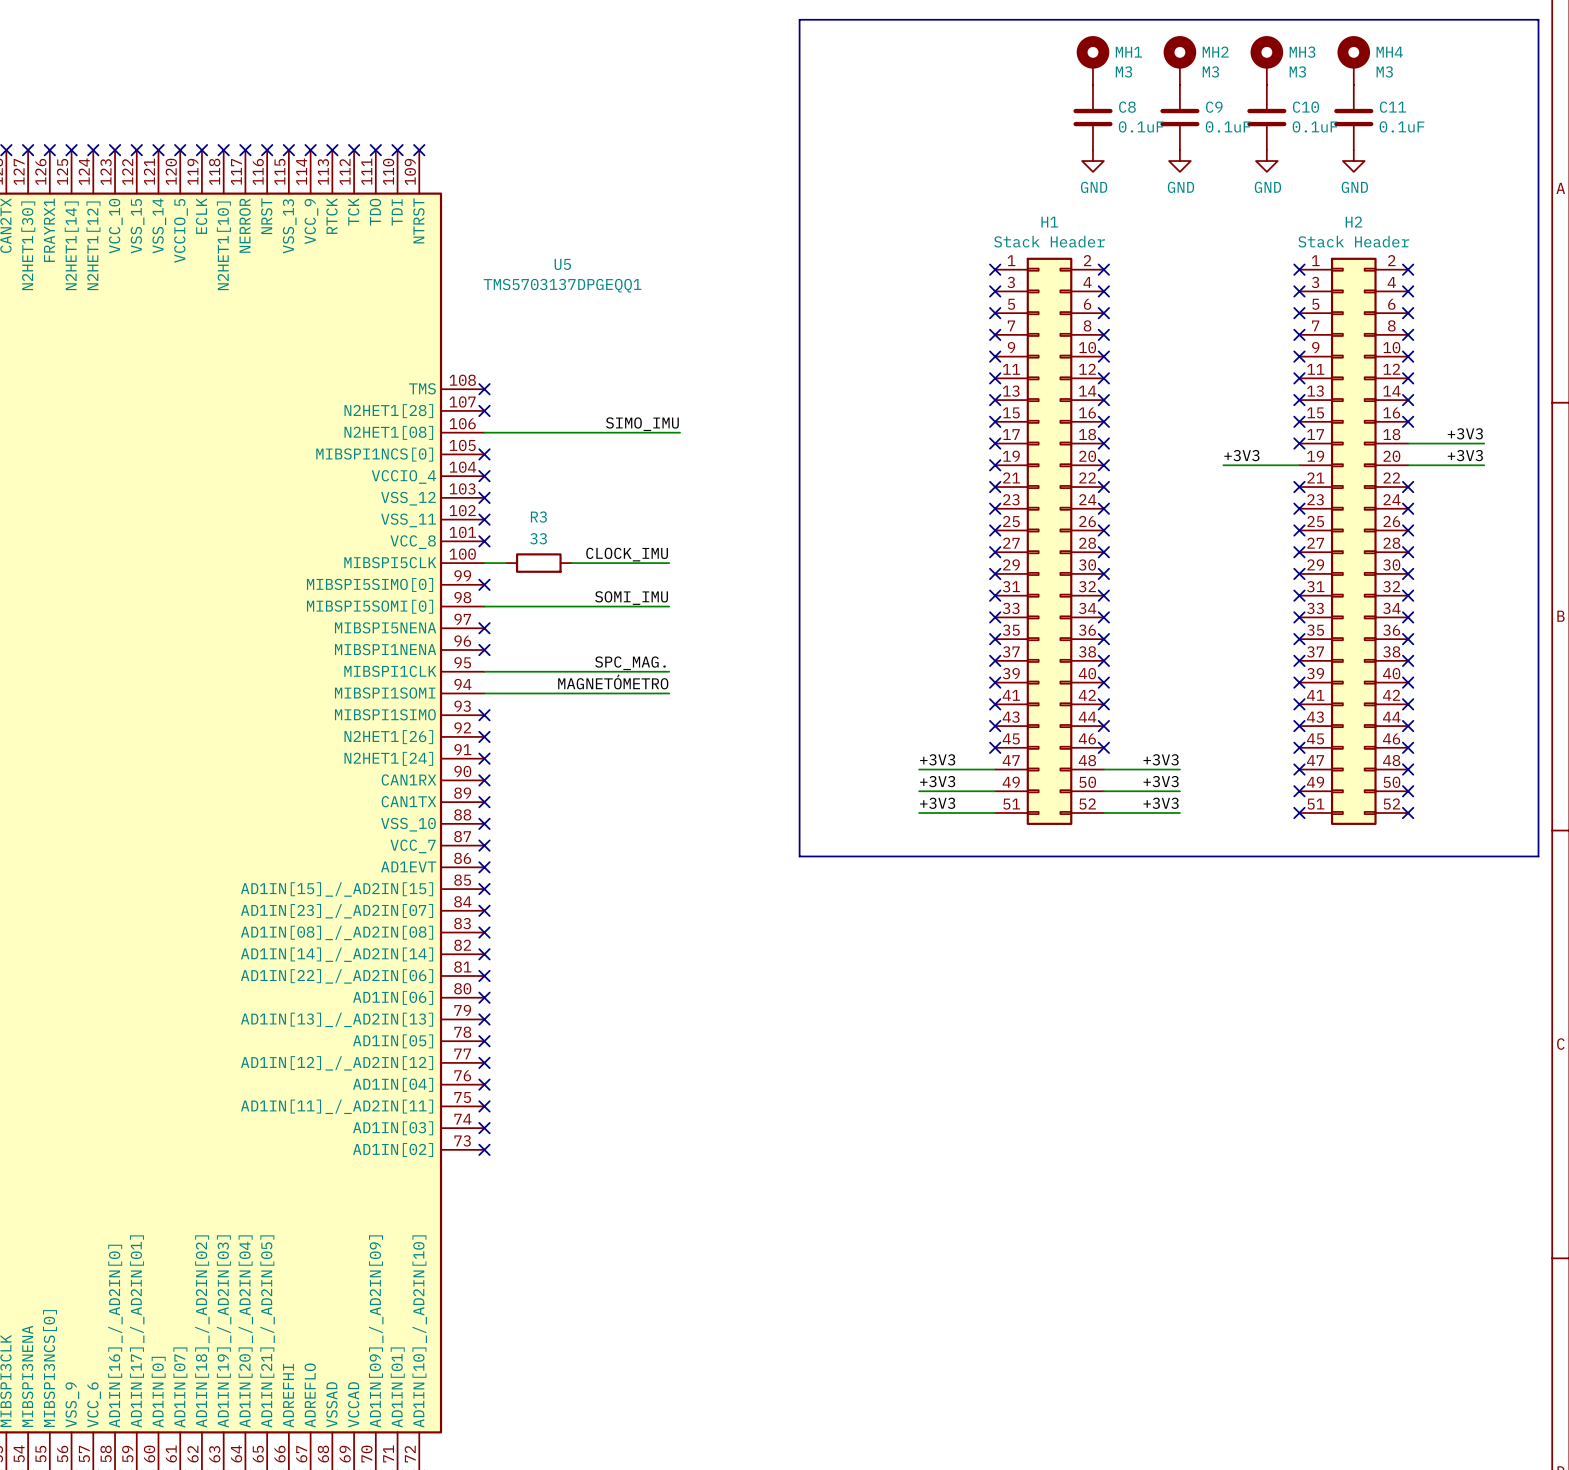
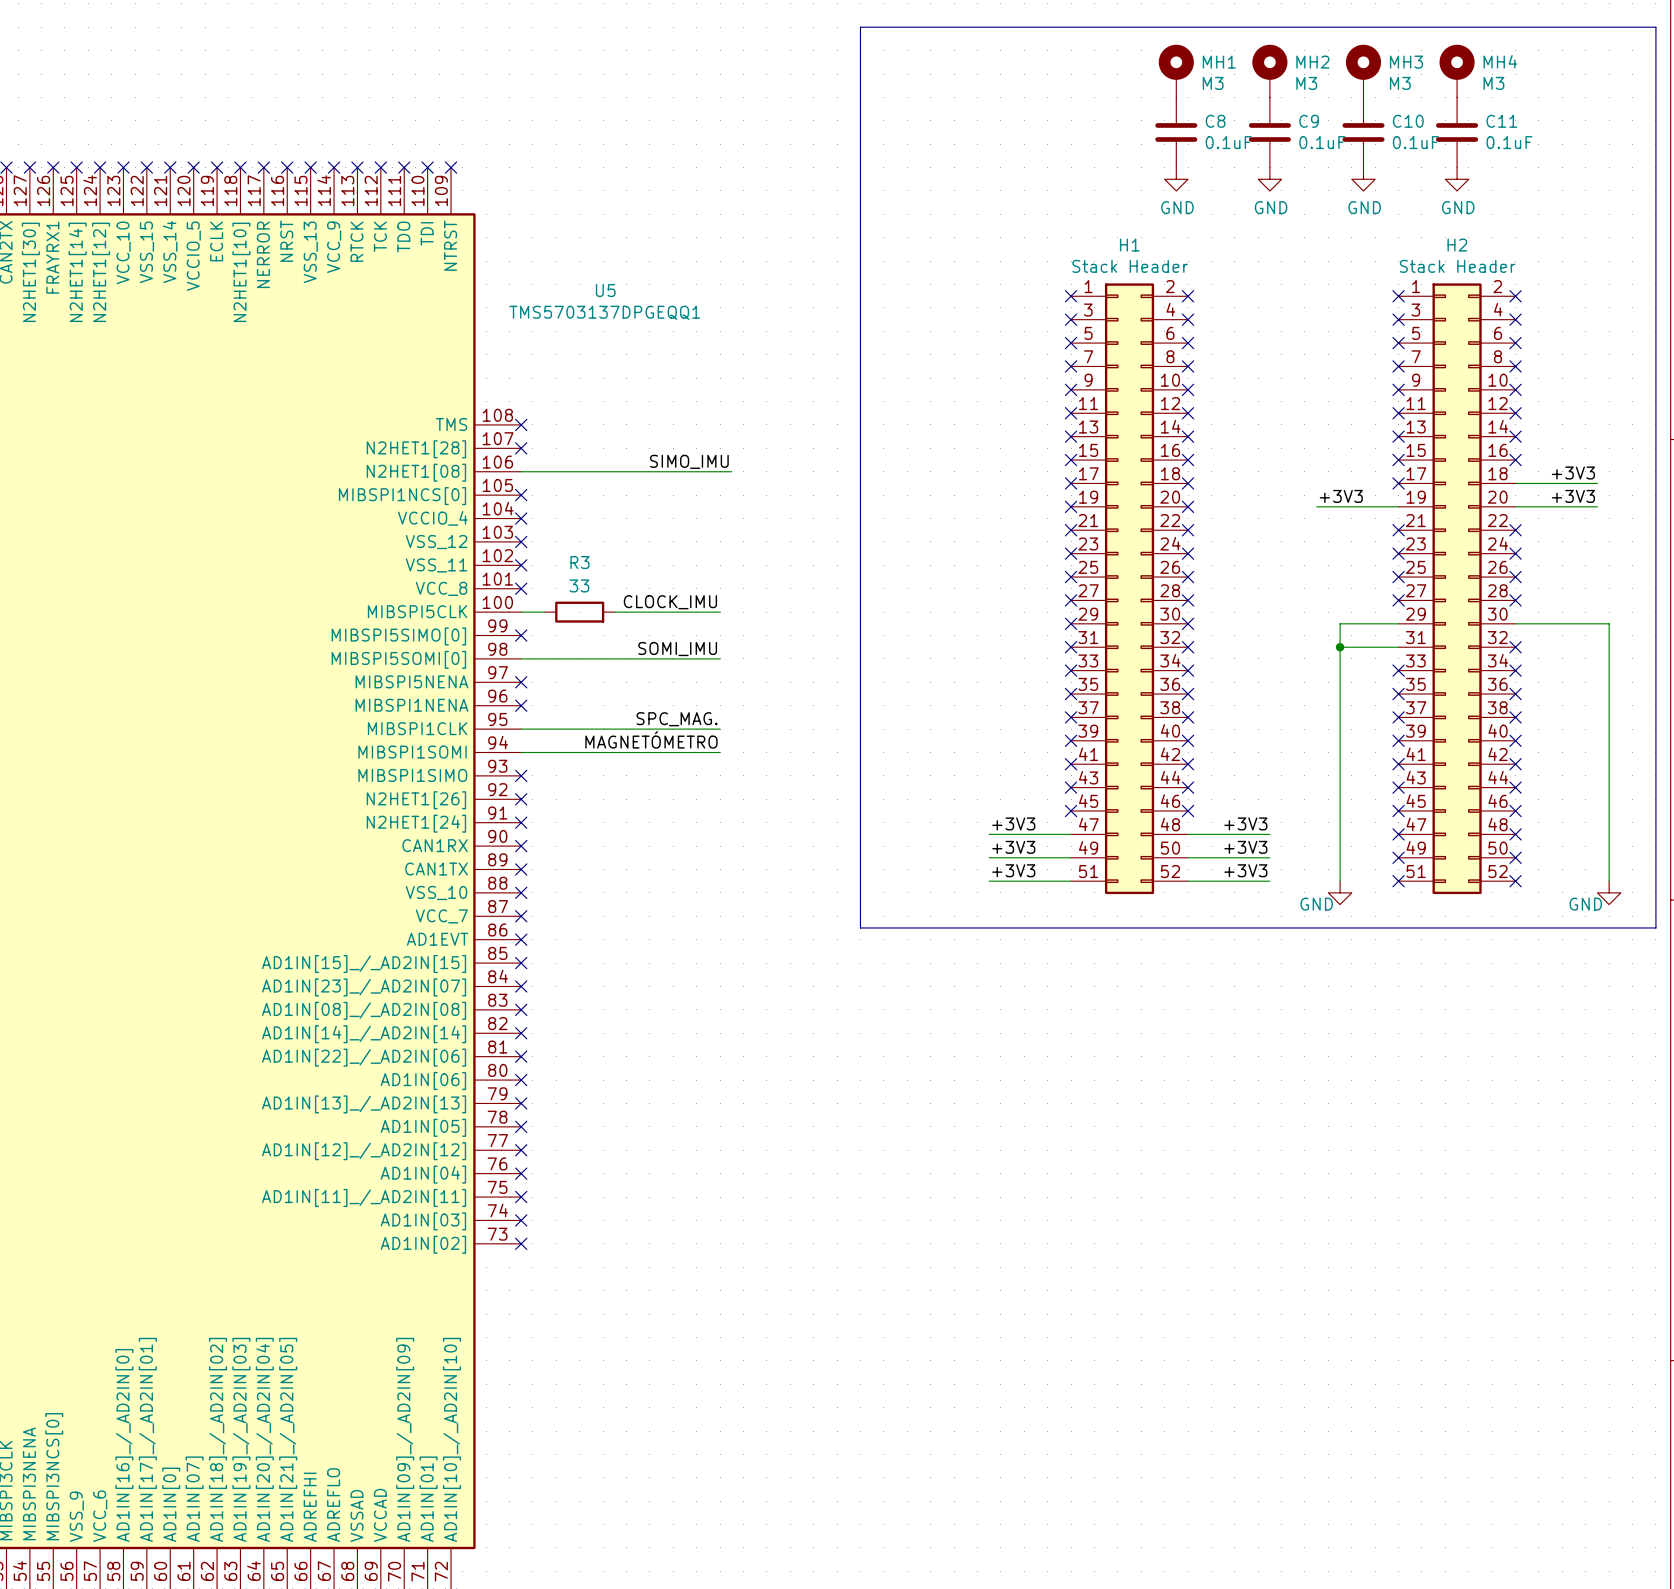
wire: none -> (1398, 623) (1340, 623) (1340, 881)
no-connect mark: (1299, 573) -> none
wire: none -> (1515, 623) (1609, 623) (1609, 881)
no-connect mark: (1408, 573) -> none
wire: none -> (1340, 647) (1398, 647)
junction: none -> (1340, 647)
no-connect mark: (1299, 595) -> none
power symbol: none -> GND (1340, 892)
power symbol: none -> GND (1609, 892)

